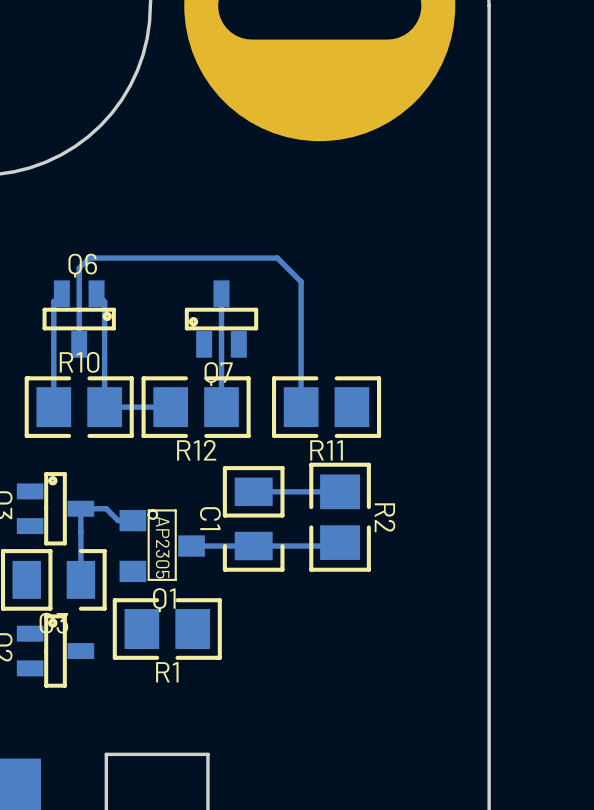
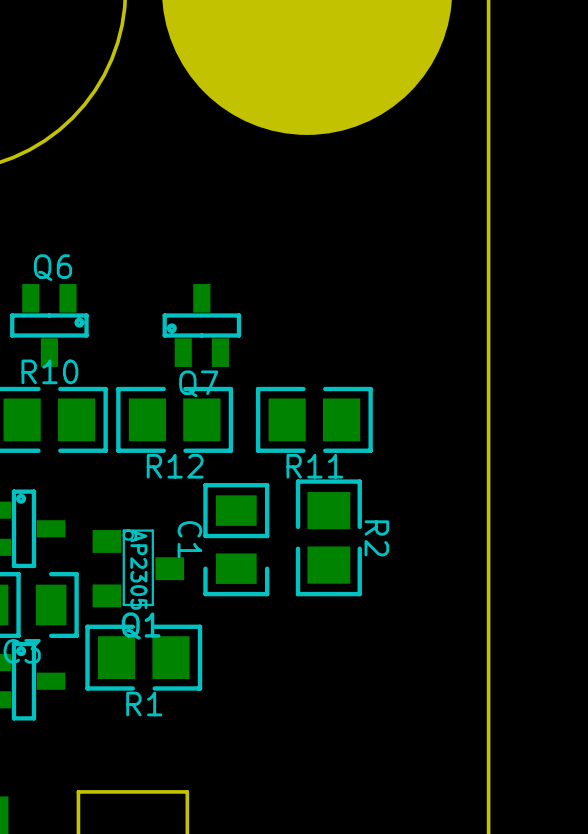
track: (61, 293) (53, 301) (53, 407) -> none
track: (96, 293) (104, 301) (104, 407) (170, 407) -> none
track: (221, 293) (221, 407) -> none
track: (79, 344) (79, 268) (89, 258) (277, 258) (301, 281) (301, 407) -> none
track: (340, 491) (253, 491) -> none
track: (132, 520) (118, 520) (106, 508) (80, 508) (80, 532) -> none
track: (80, 532) (80, 579) -> none
track: (340, 542) (336, 546) (191, 546) -> none

